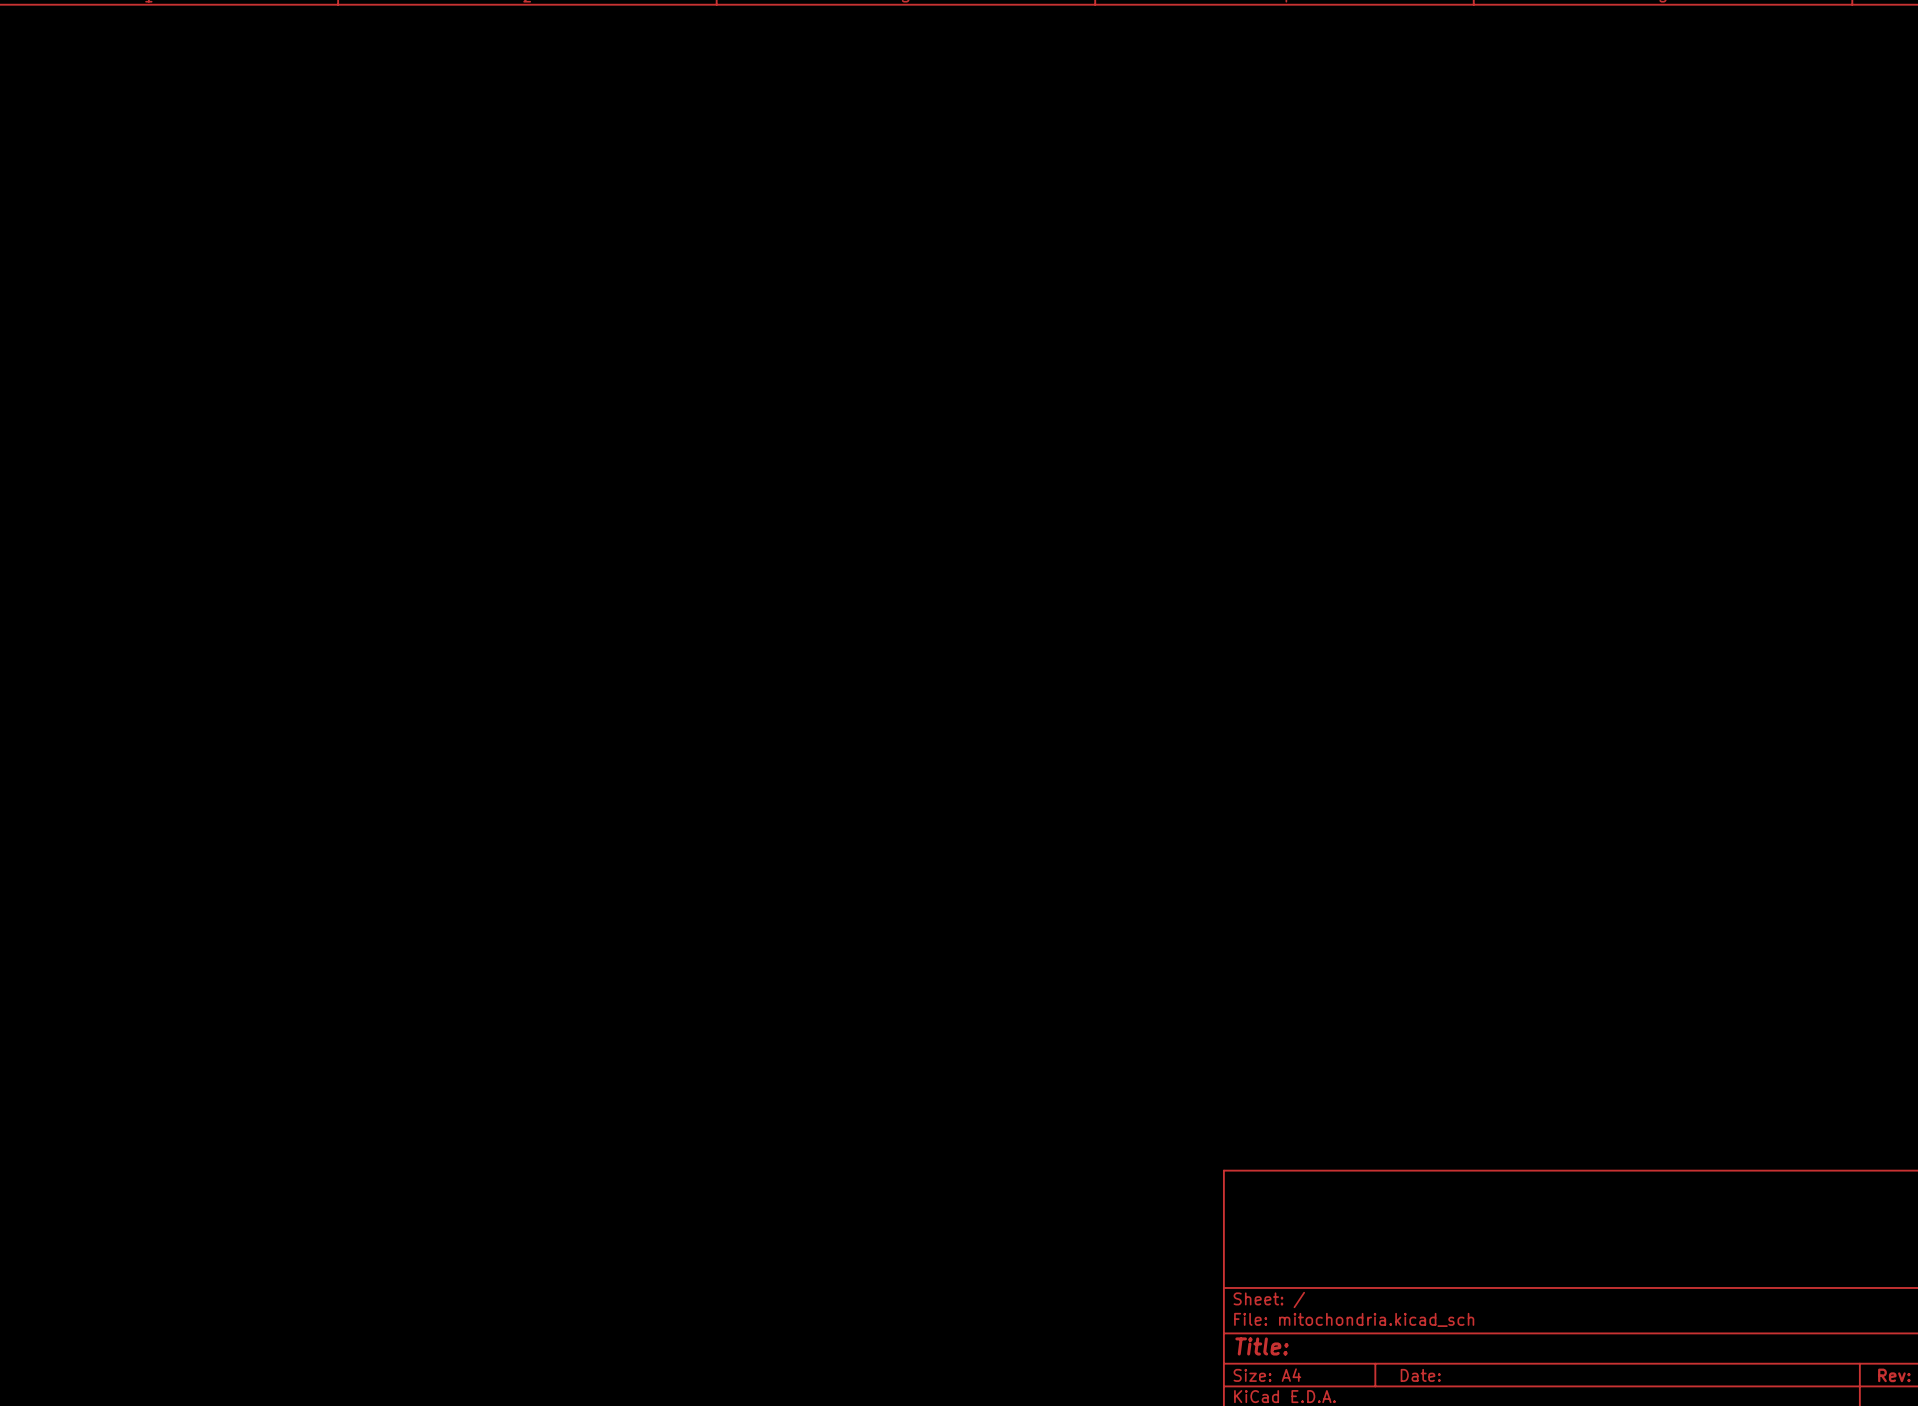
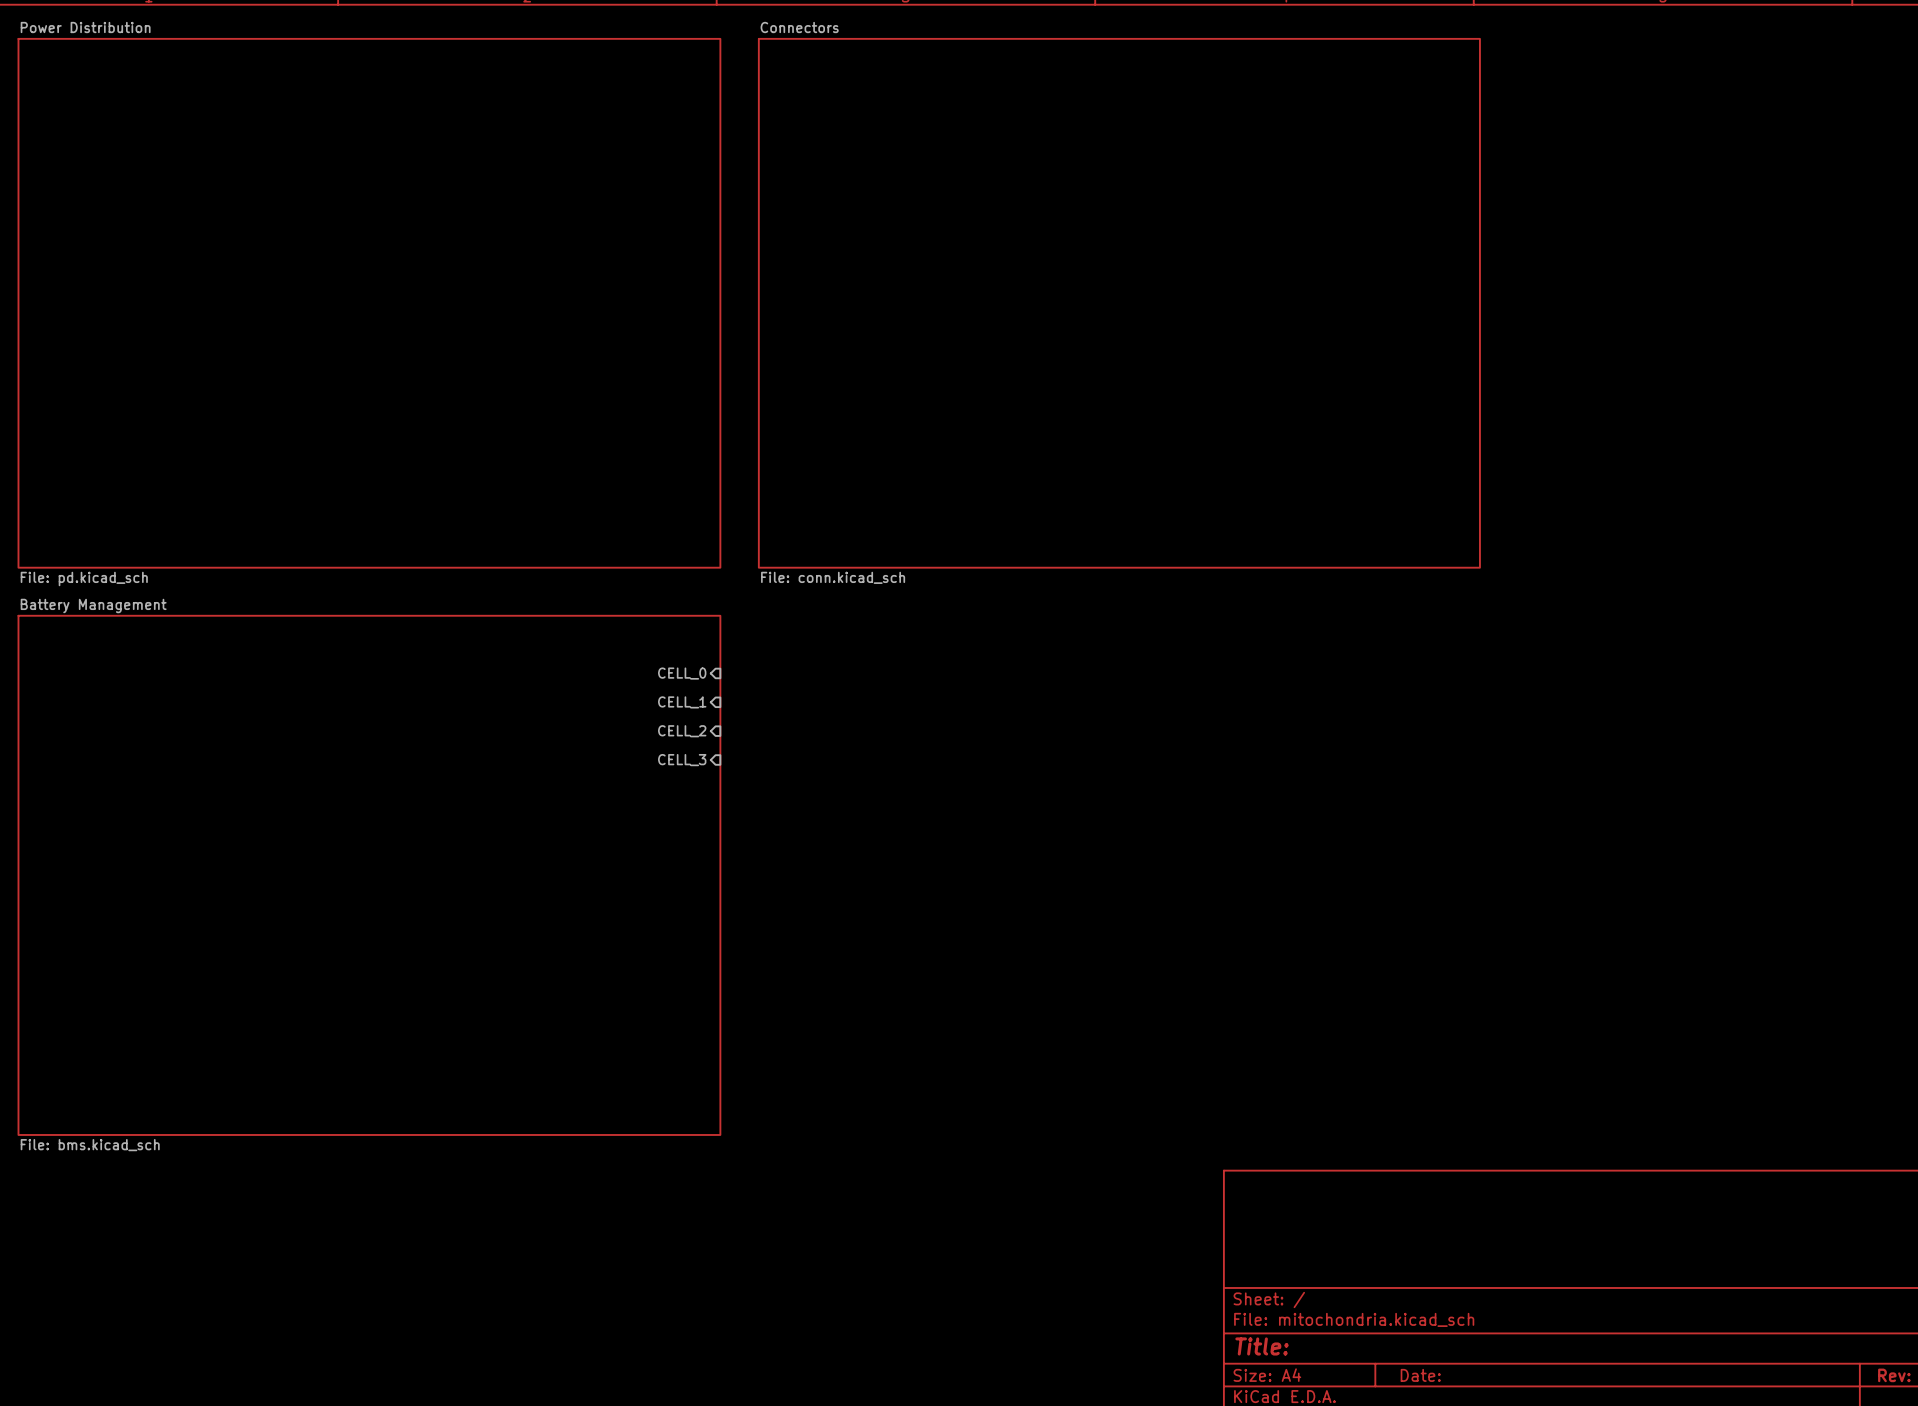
sheet Power Distribution: none -> File: pd.kicad_sch (369, 303)
sheet Connectors: none -> File: conn.kicad_sch (1119, 303)
sheet pin: none -> CELL_0 (682, 673)
sheet pin: none -> CELL_1 (682, 702)
sheet pin: none -> CELL_2 (682, 731)
sheet pin: none -> CELL_3 (682, 760)
sheet Battery Management: none -> File: bms.kicad_sch (369, 875)

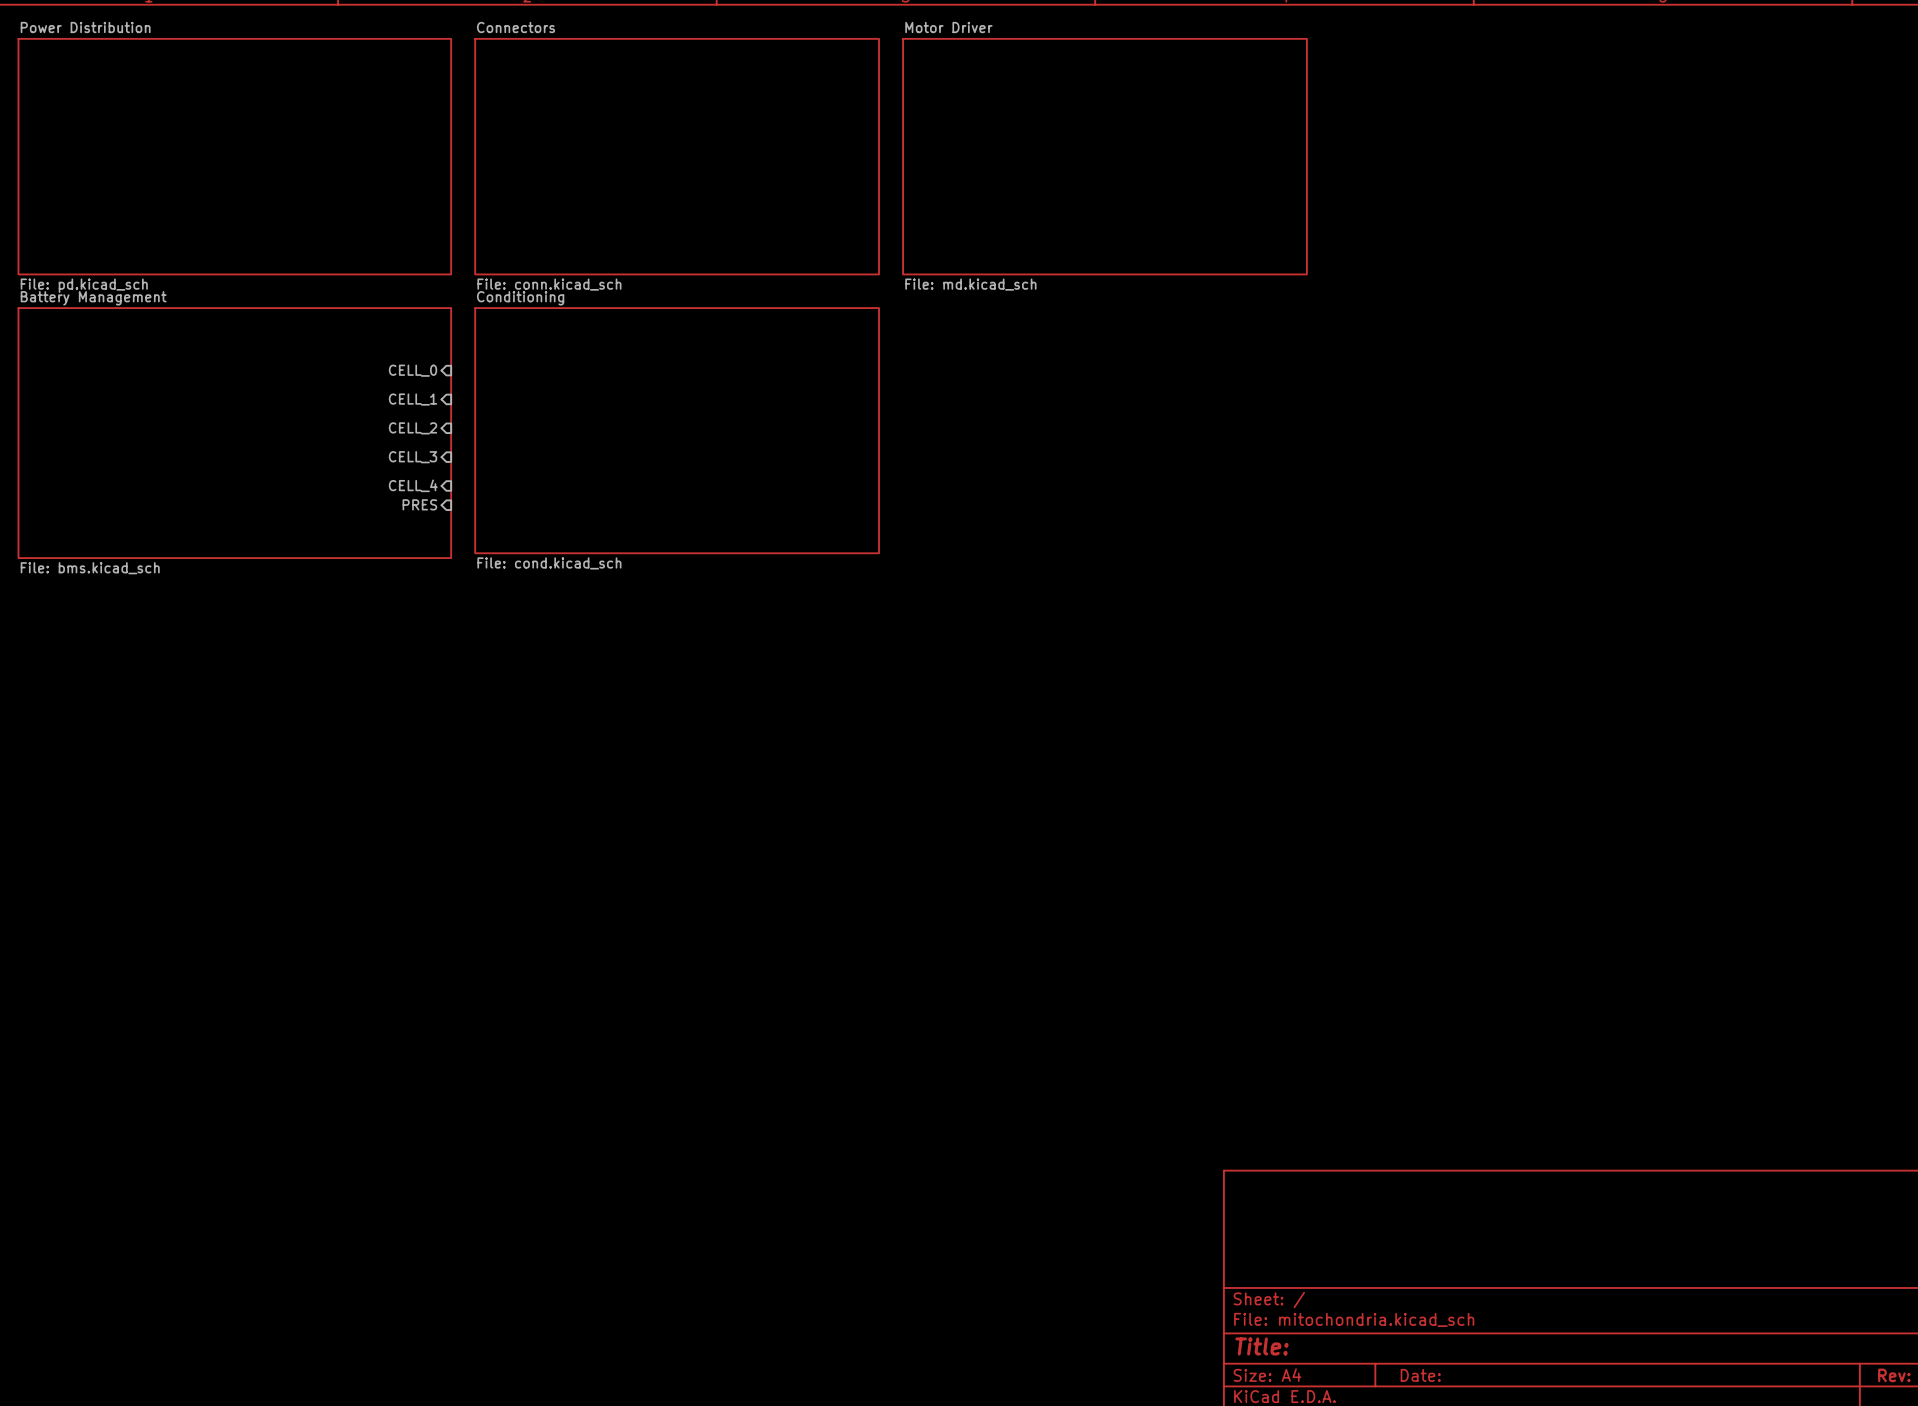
sheet Power Distribution: none -> File: pd.kicad_sch (234, 156)
sheet Connectors: none -> File: conn.kicad_sch (677, 156)
sheet Motor Driver: none -> File: md.kicad_sch (1104, 156)
sheet Power Distribution: File: pd.kicad_sch (369, 303) -> none
sheet Connectors: File: conn.kicad_sch (1119, 303) -> none
sheet pin: none -> CELL_0 (413, 370)
sheet pin: none -> CELL_1 (413, 399)
sheet pin: none -> CELL_2 (413, 428)
sheet Conditioning: none -> File: cond.kicad_sch (677, 430)
sheet Battery Management: none -> File: bms.kicad_sch (234, 433)
sheet pin: none -> CELL_3 (413, 457)
sheet pin: none -> CELL_4 (413, 485)
sheet pin: none -> PRES (419, 504)
sheet pin: CELL_0 (682, 673) -> none
sheet pin: CELL_1 (682, 702) -> none
sheet pin: CELL_2 (682, 731) -> none
sheet pin: CELL_3 (682, 760) -> none
sheet Battery Management: File: bms.kicad_sch (369, 875) -> none

